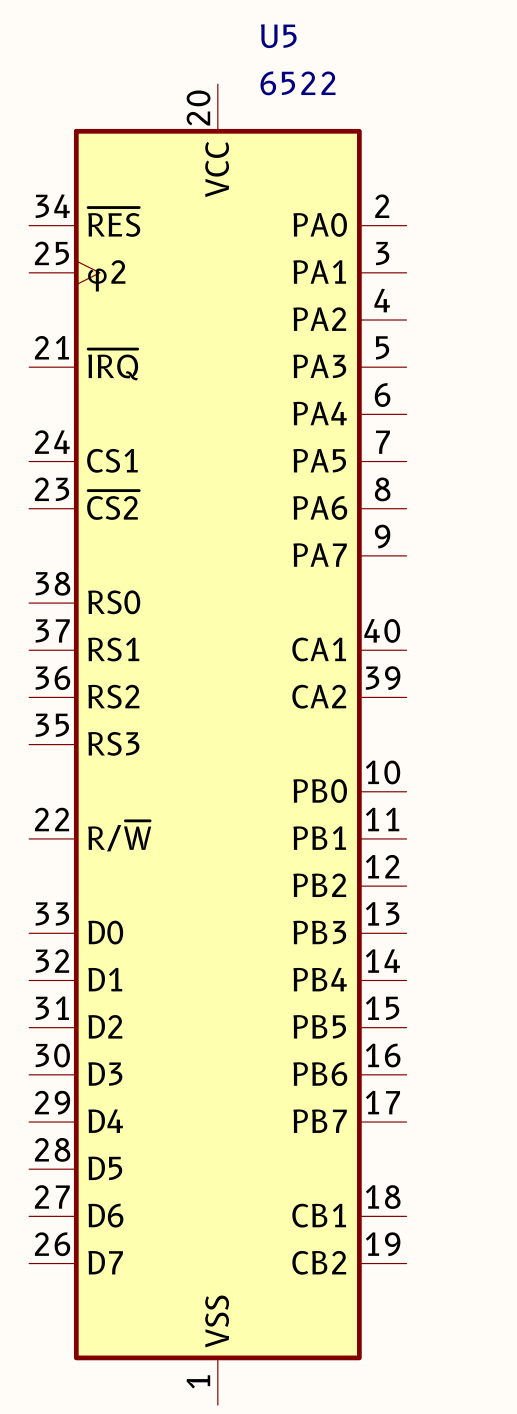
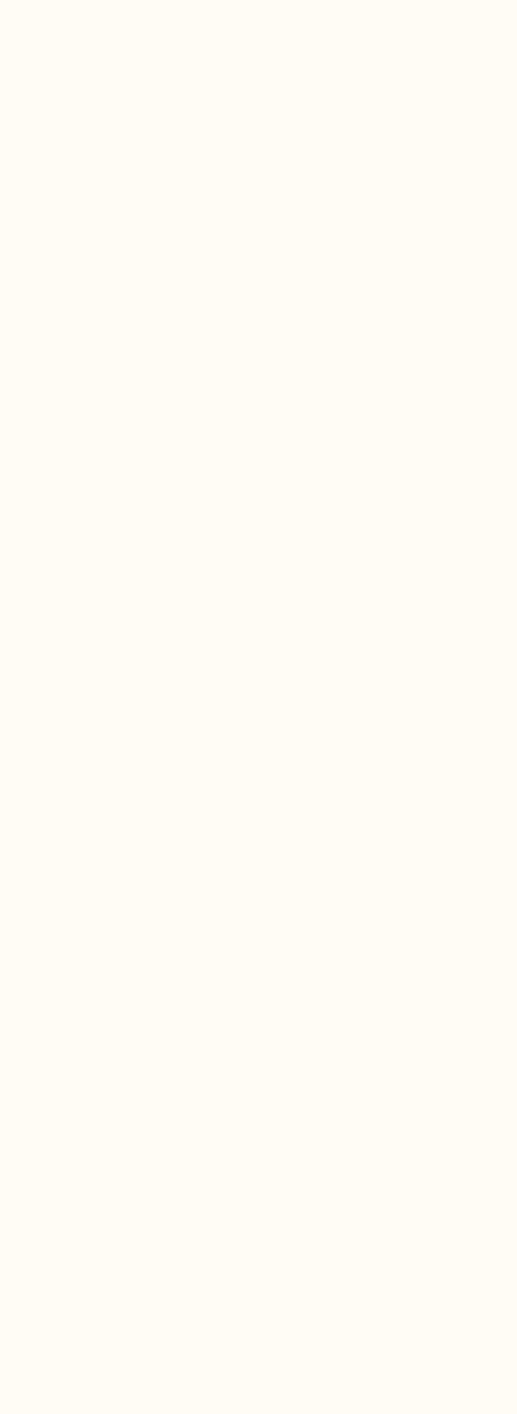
U5: 6522 (217, 744) -> none

